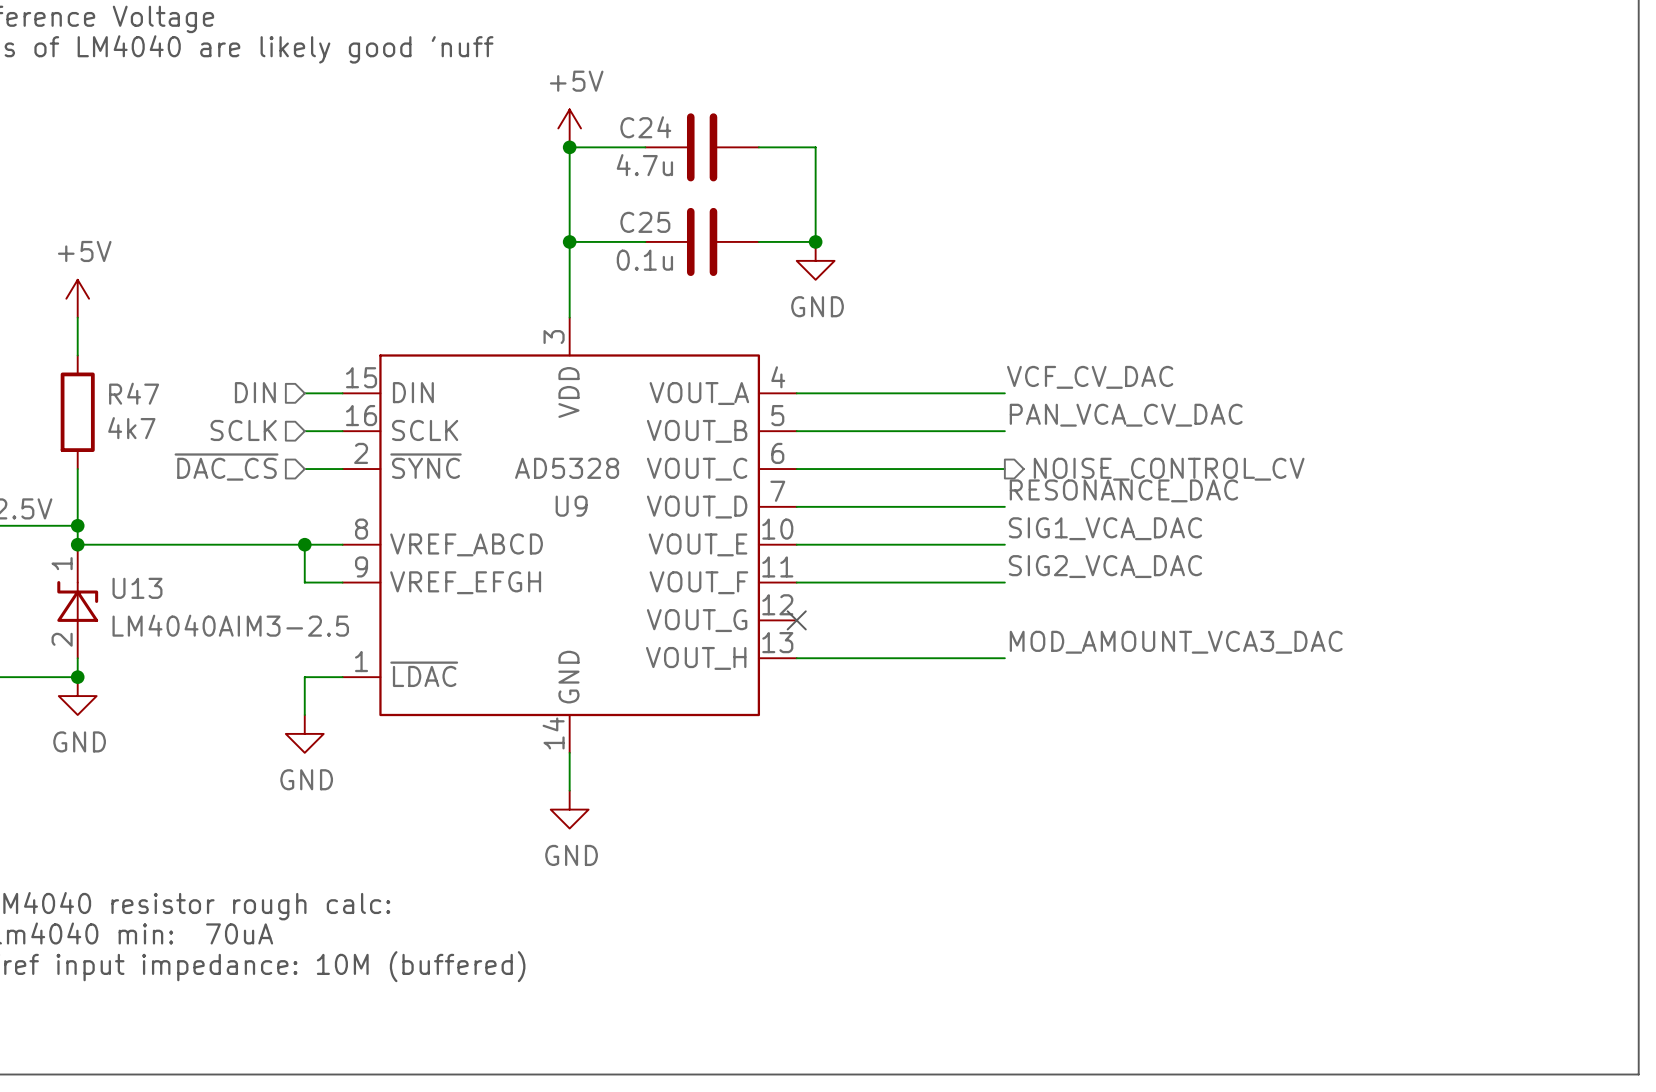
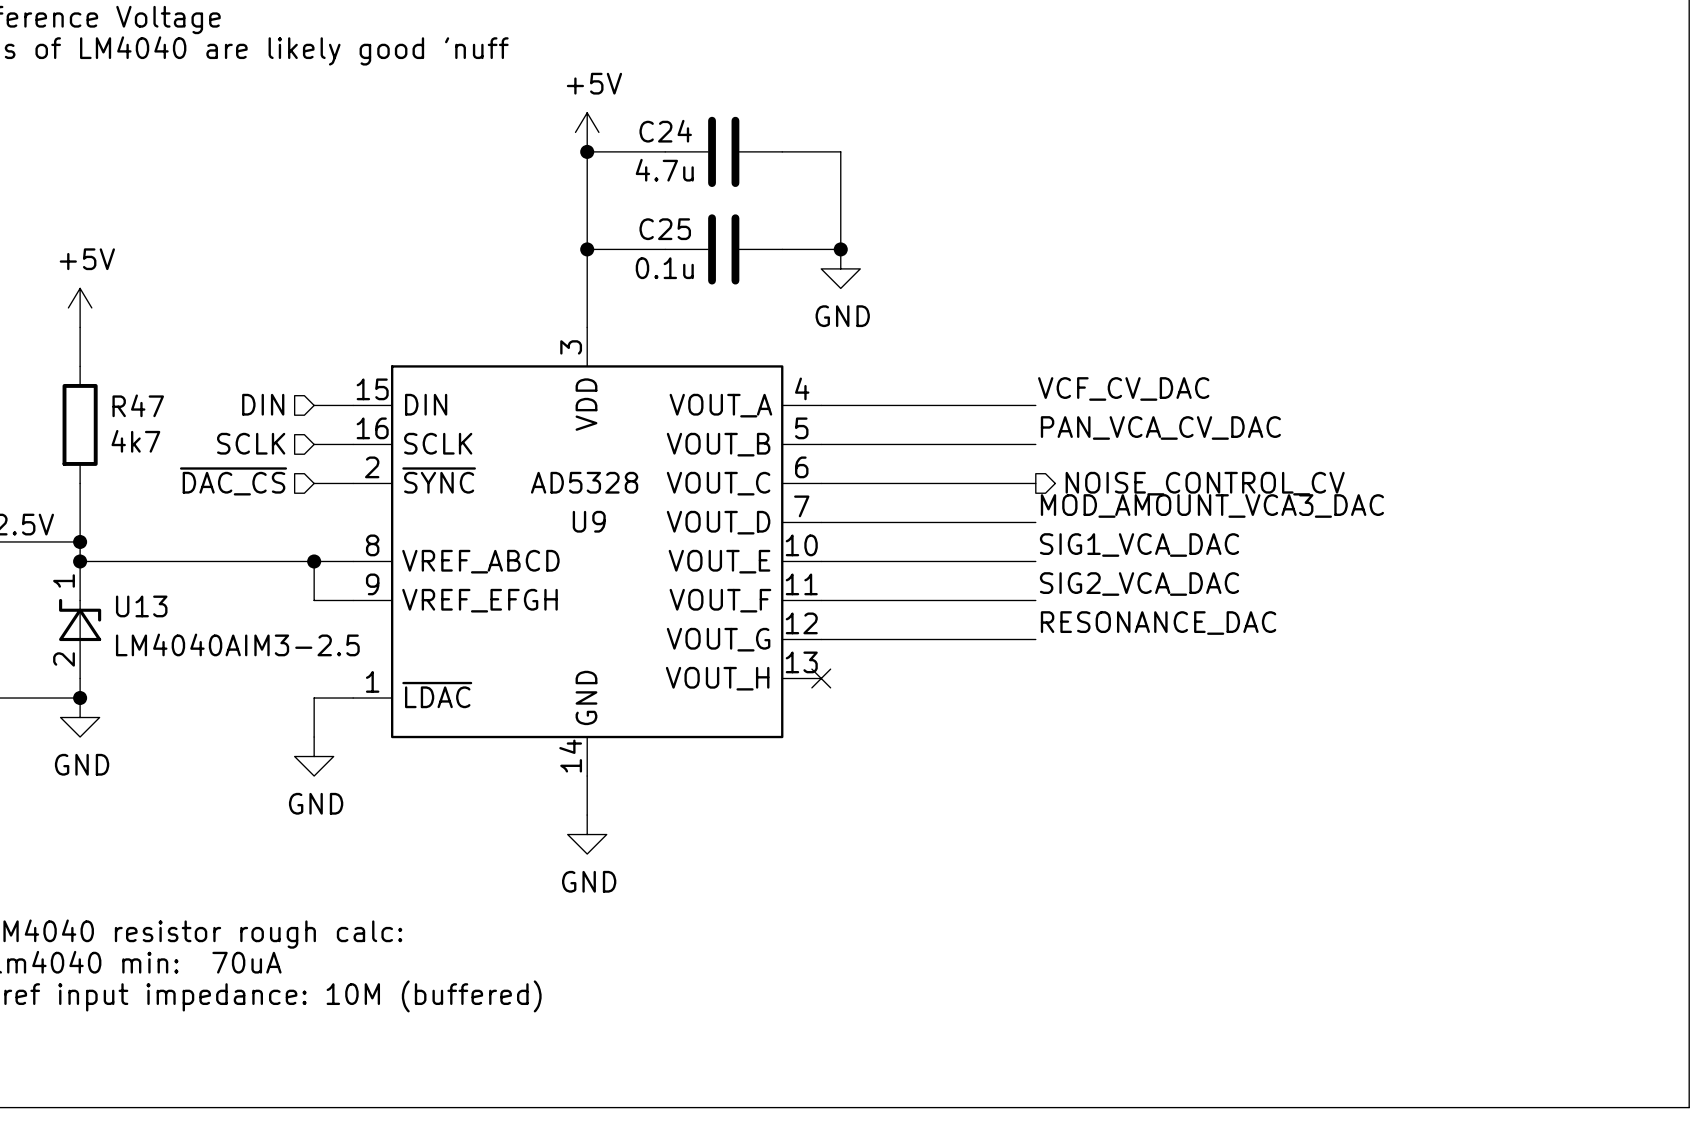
label: RESONANCE_DAC (1123, 490) -> MOD_AMOUNT_VCA3_DAC (1212, 505)
label: none -> RESONANCE_DAC (1158, 623)
no-connect mark position: (796, 620) -> (821, 678)
label: MOD_AMOUNT_VCA3_DAC (1176, 642) -> none
wire: (796, 658) (1004, 658) -> (821, 639) (1035, 639)

